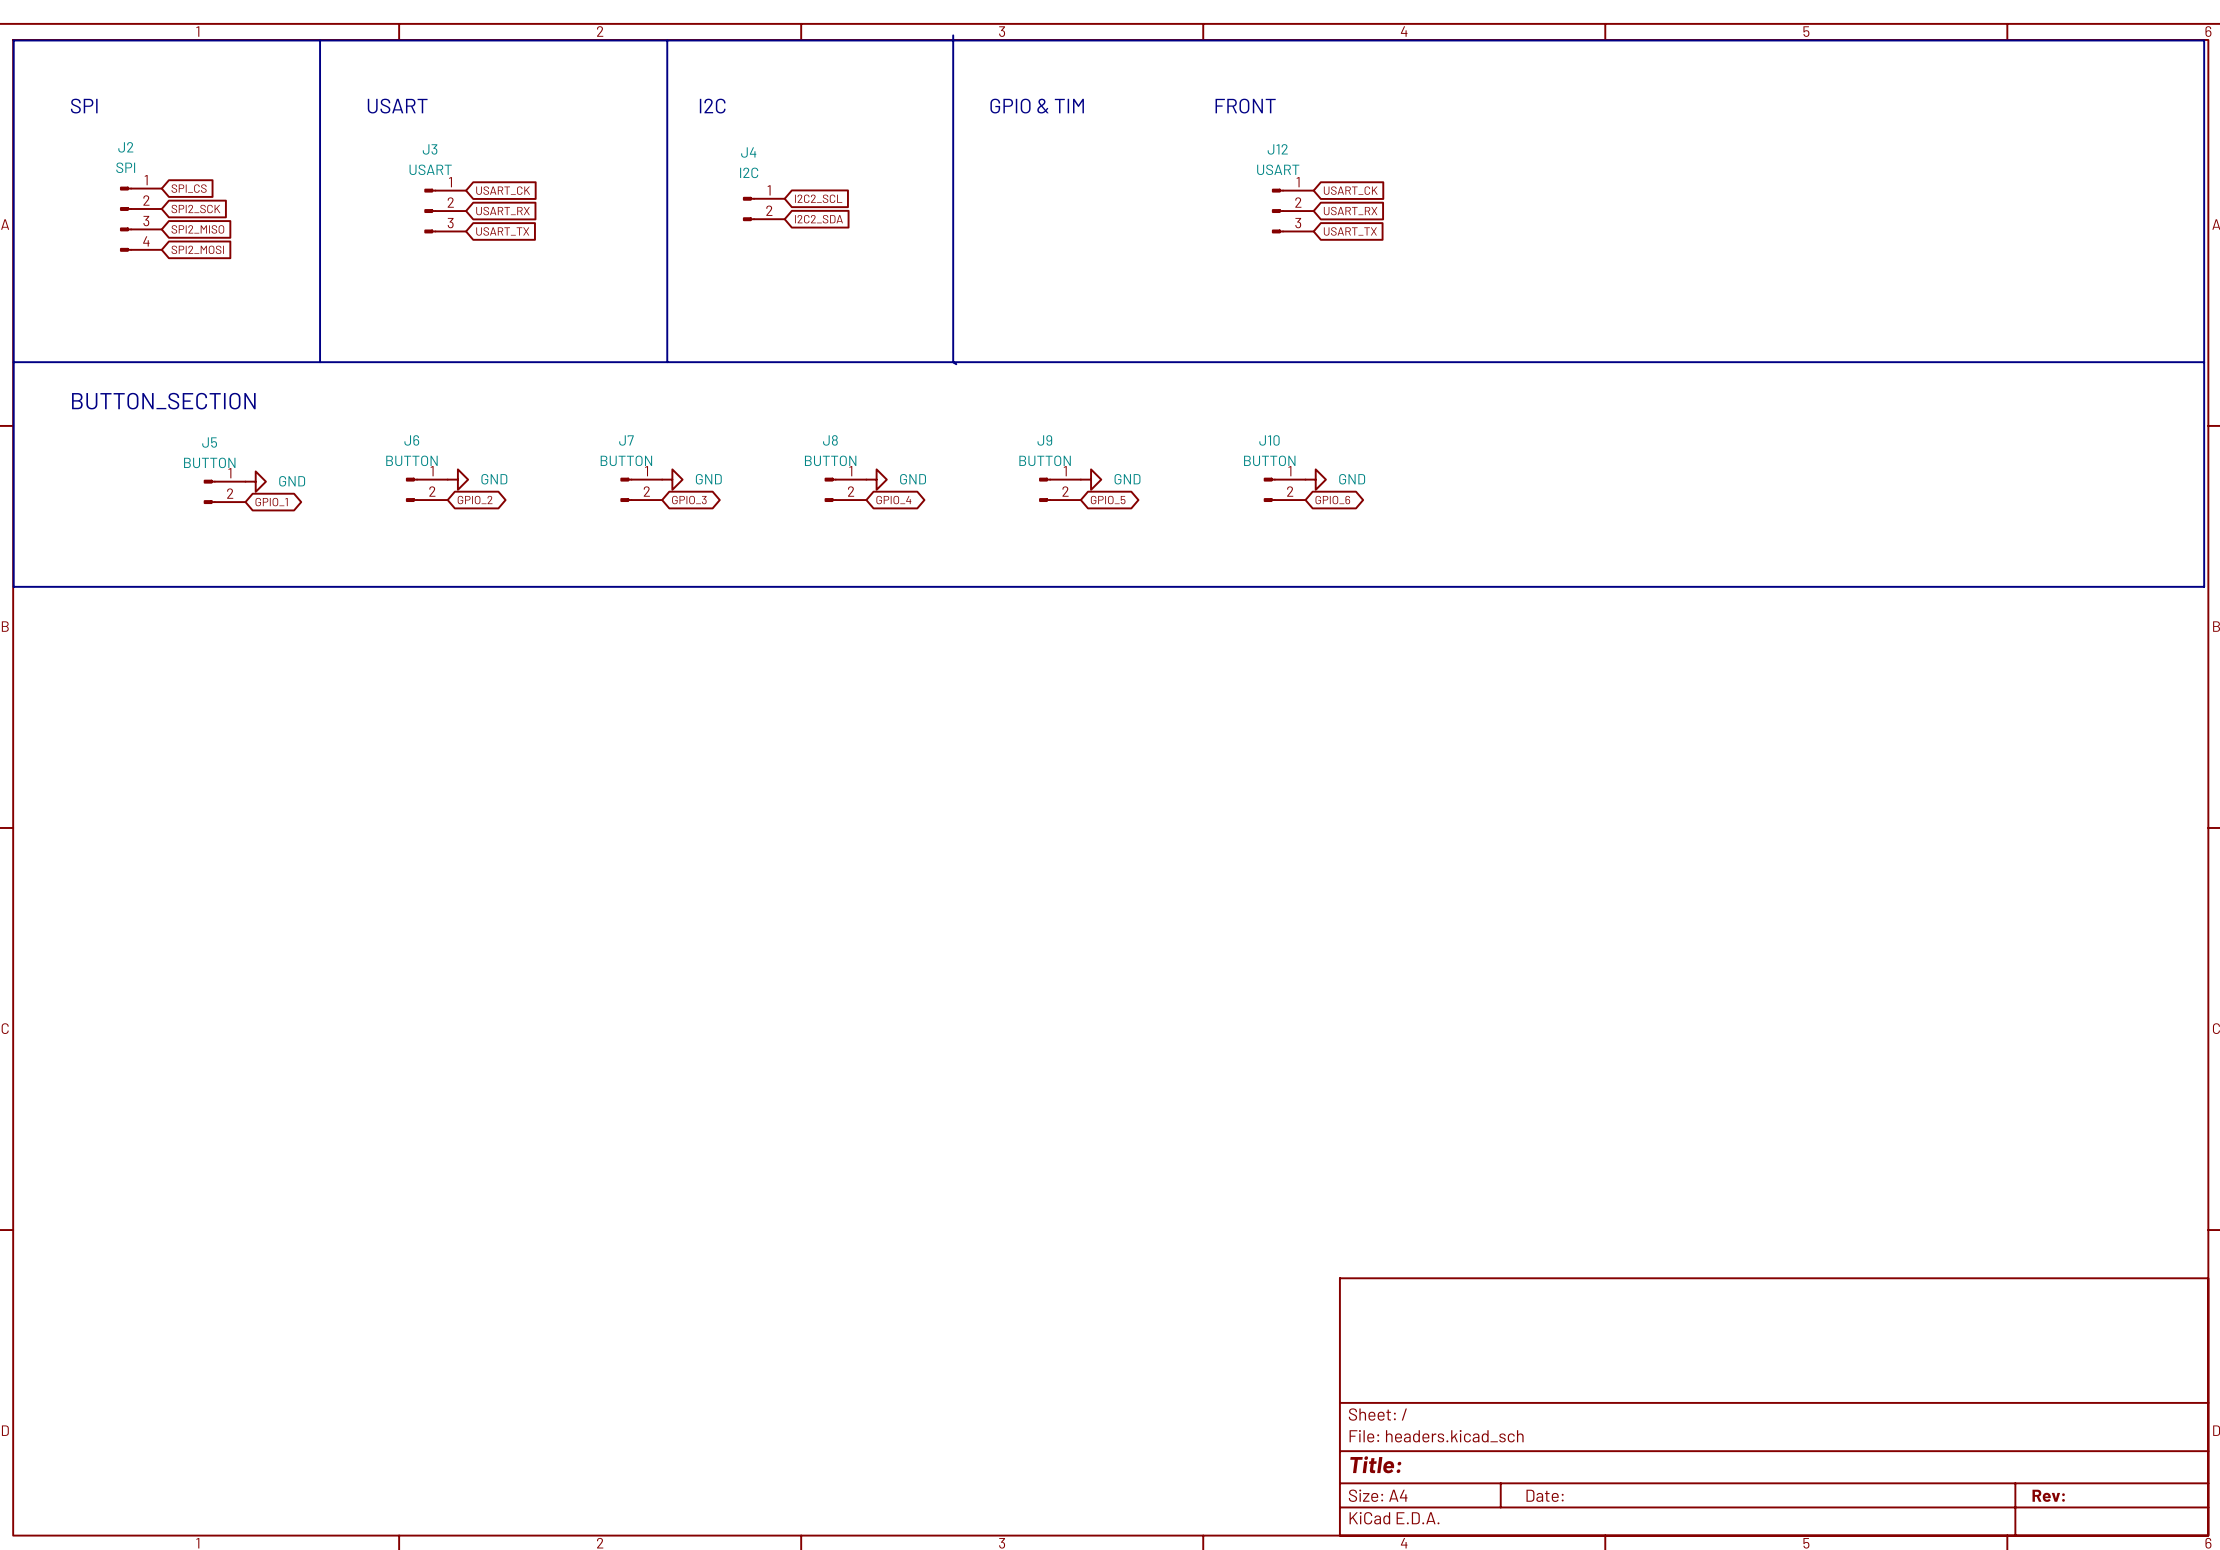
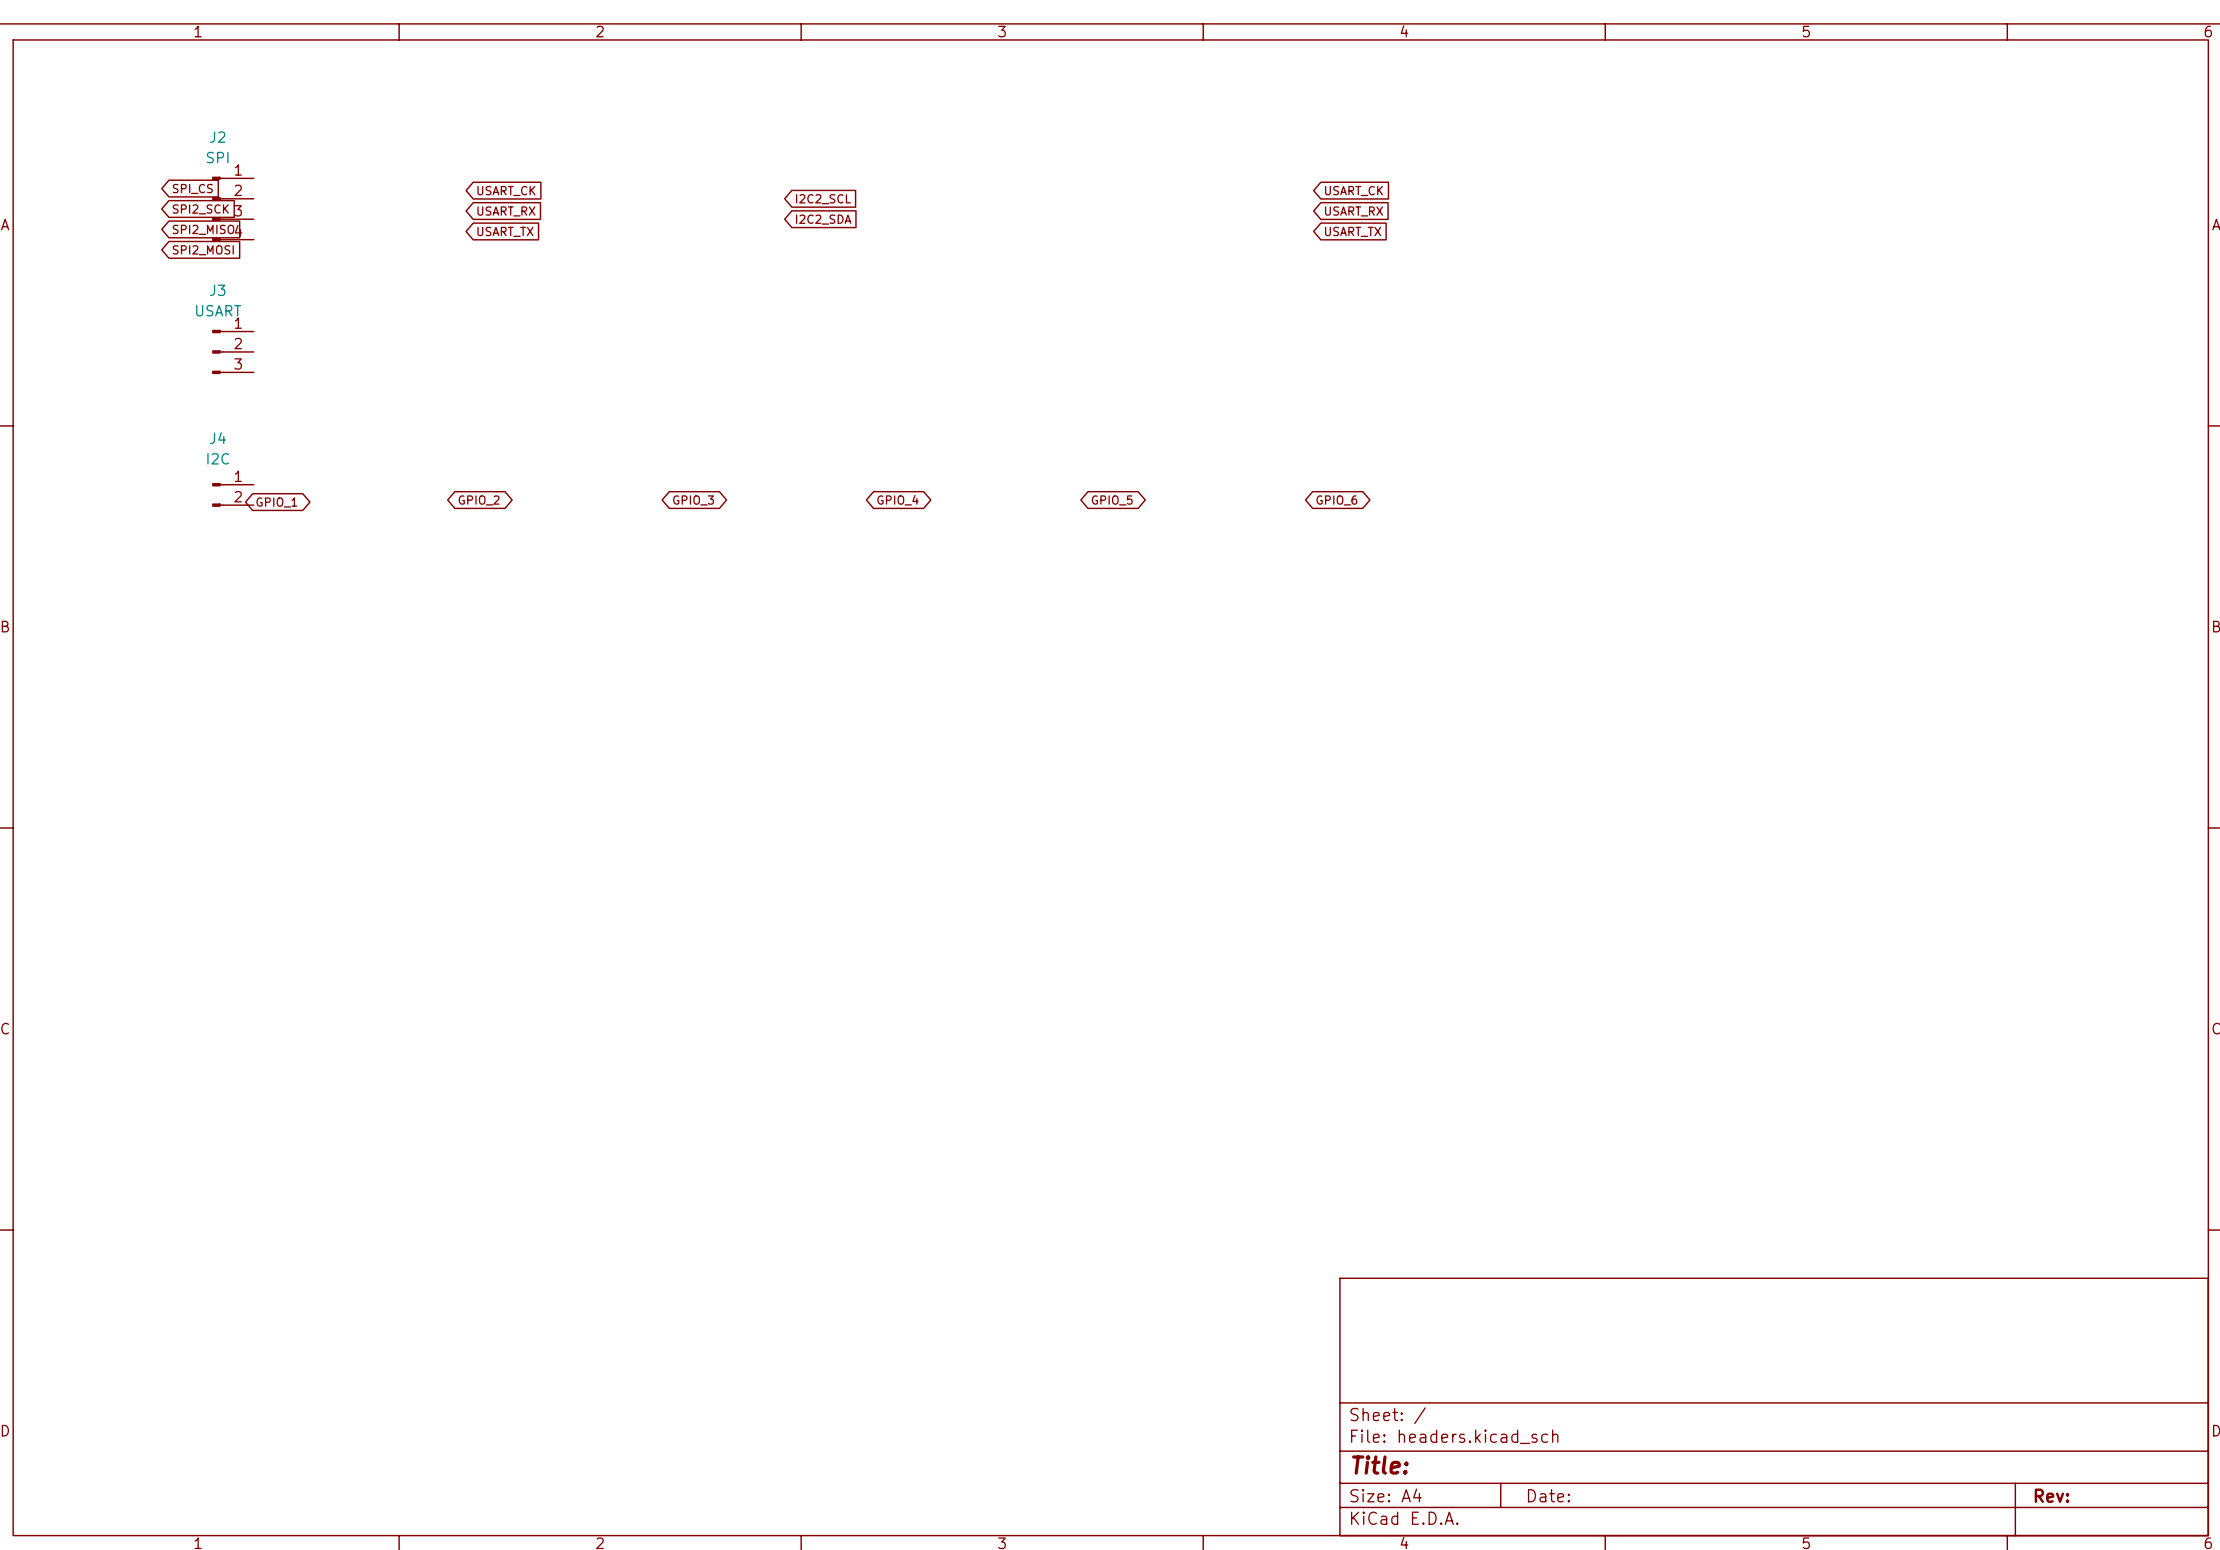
line: (953, 35) (953, 362) (956, 364) -> none
line: (13, 40) (2204, 40) (2204, 586) (13, 586) (13, 40) -> none
line: (320, 40) (320, 362) -> none
line: (667, 40) (667, 362) -> none
text: SPI (84, 106) -> none
text: USART (397, 106) -> none
text: I2C (712, 106) -> none
text: GPIO & TIM (1037, 106) -> none
text: FRONT (1245, 106) -> none
J4 position: (763, 208) -> (232, 494)
J3 position: (445, 211) -> (232, 351)
J12: USART (1292, 211) -> none
J2 position: (141, 219) -> (232, 208)
line: (13, 362) (2204, 362) -> none
text: BUTTON_SECTION (163, 401) -> none
power symbol: GND (457, 479) -> none
power symbol: GND (672, 479) -> none
power symbol: GND (876, 479) -> none
power symbol: GND (1091, 479) -> none
power symbol: GND (1315, 479) -> none
power symbol: GND (255, 481) -> none
J6: BUTTON (426, 489) -> none
J7: BUTTON (641, 489) -> none
J8: BUTTON (845, 489) -> none
J9: BUTTON (1060, 489) -> none
J10: BUTTON (1284, 489) -> none
J5: BUTTON (224, 491) -> none

